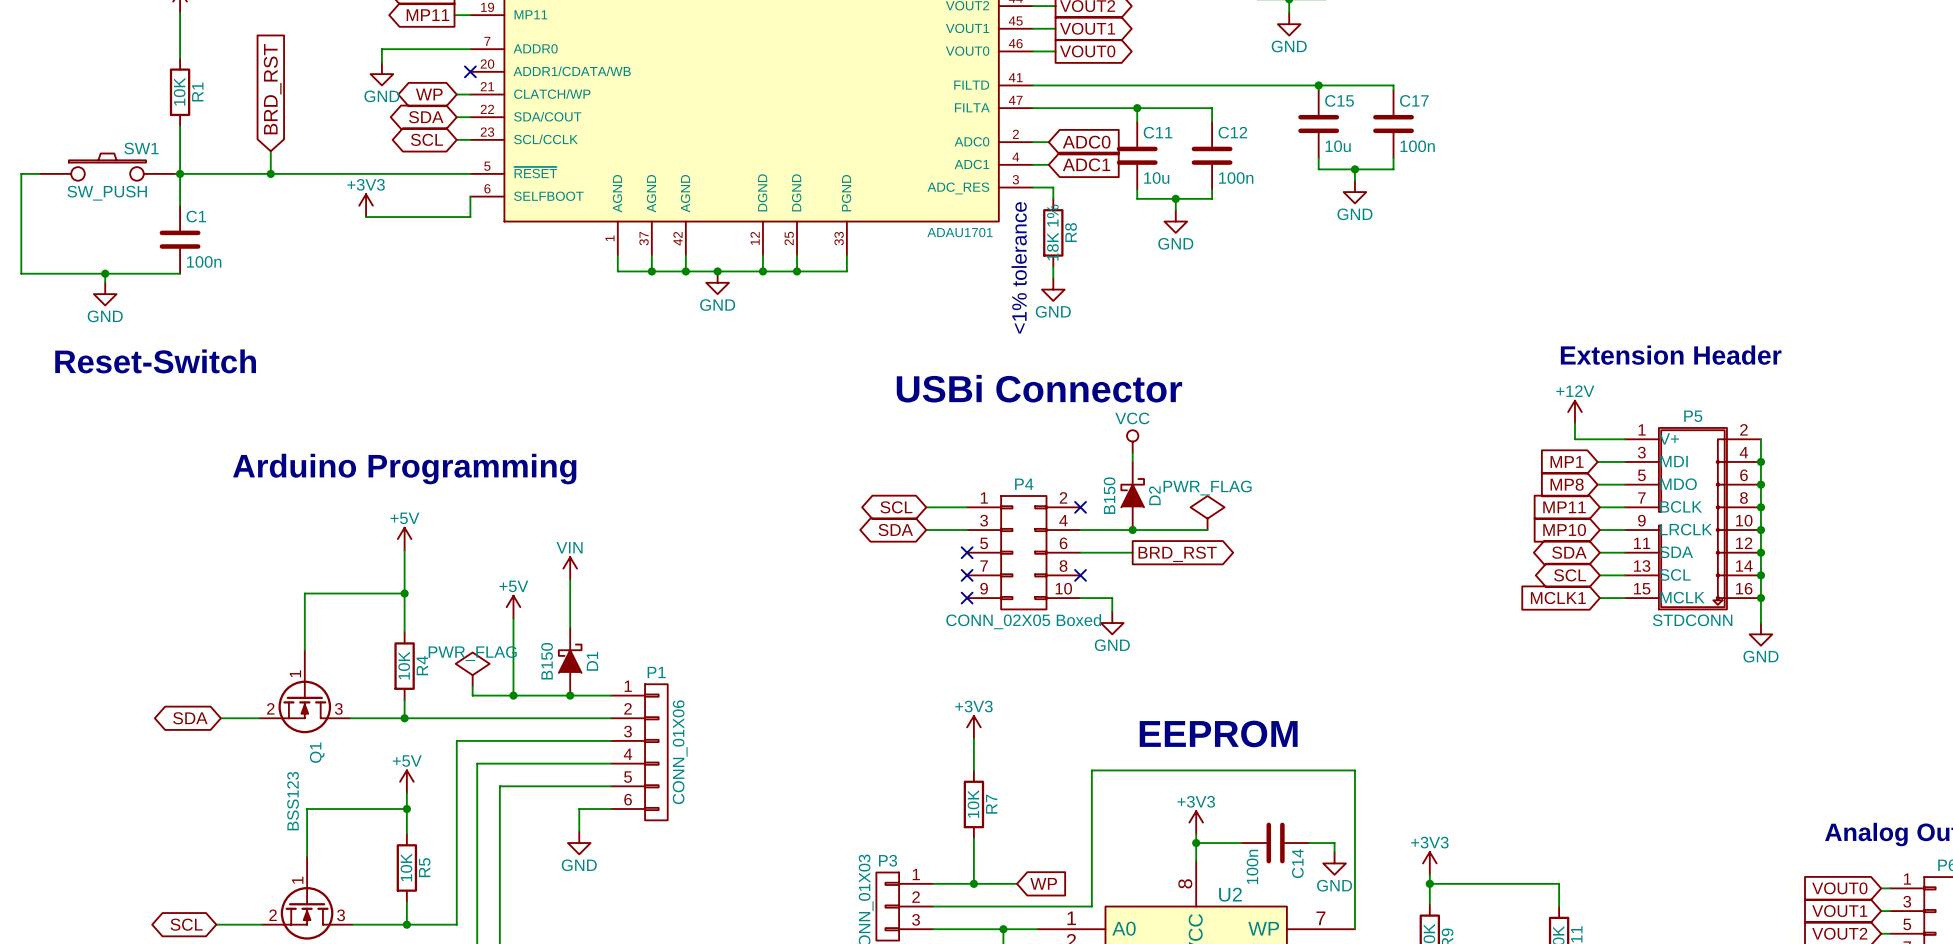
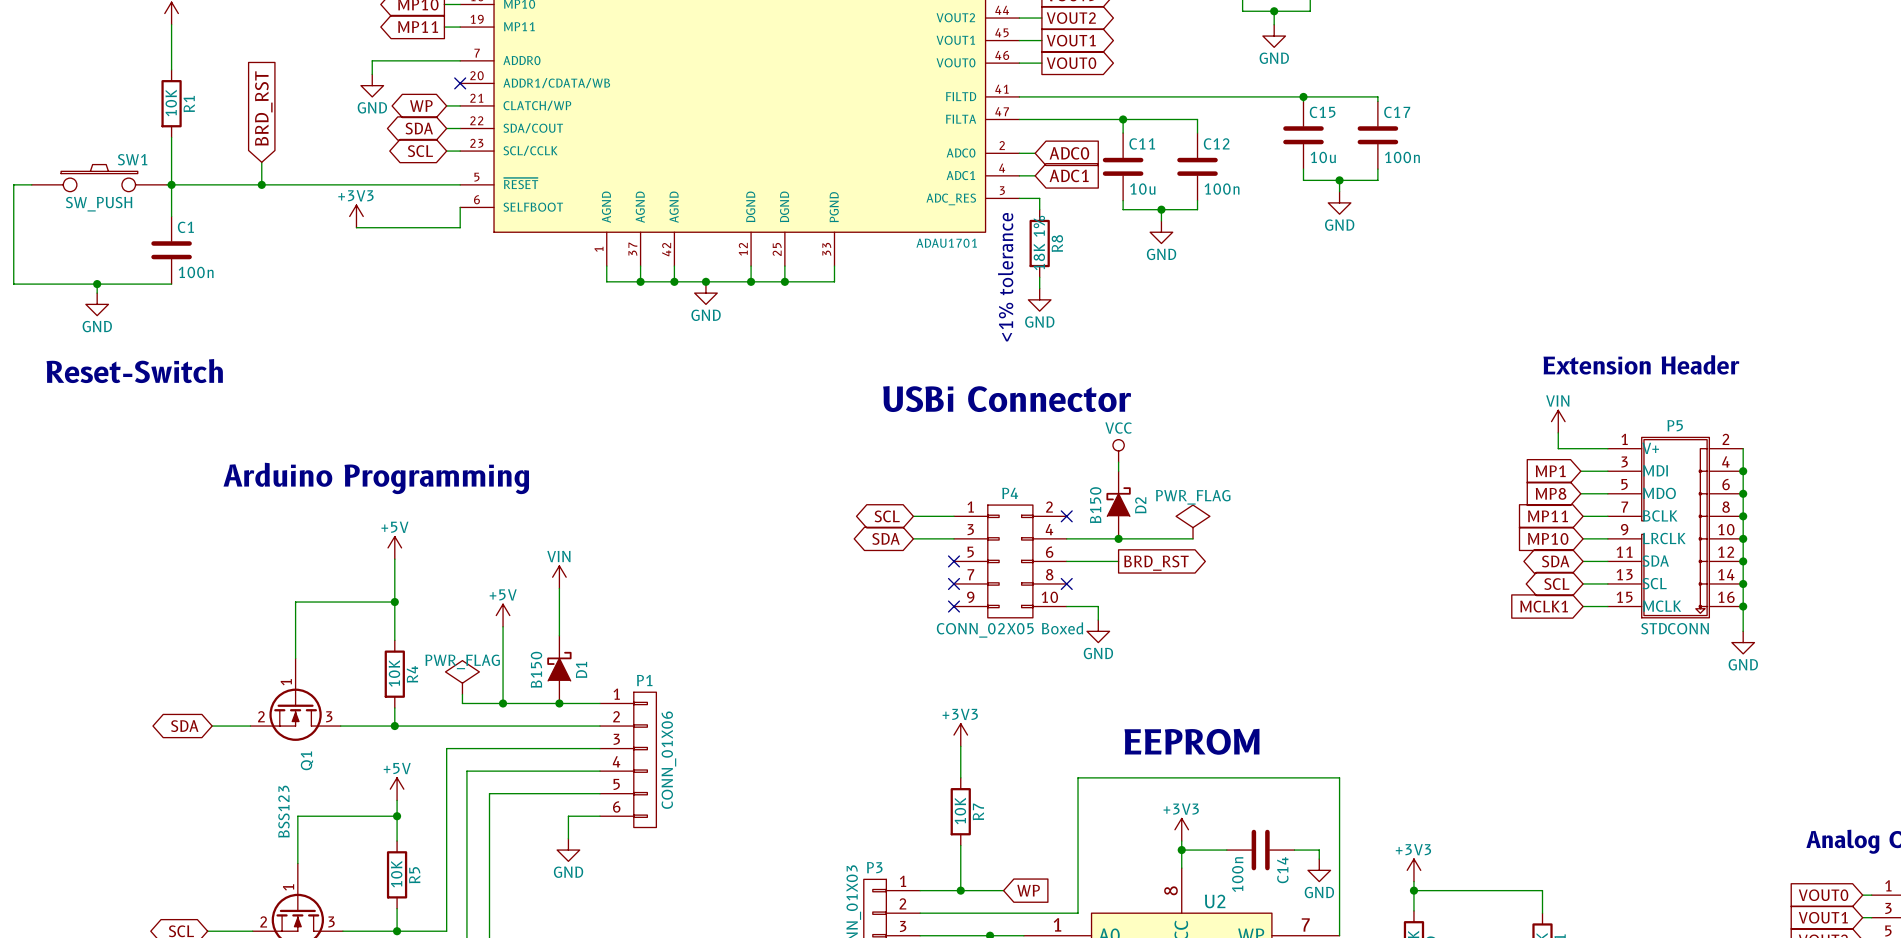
power symbol: +12V (1574, 412) -> VIN (1558, 421)

